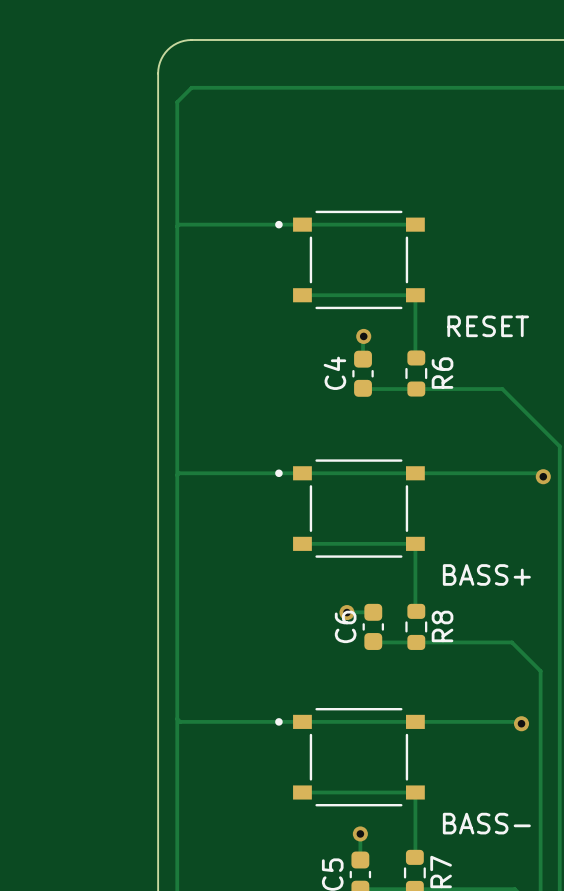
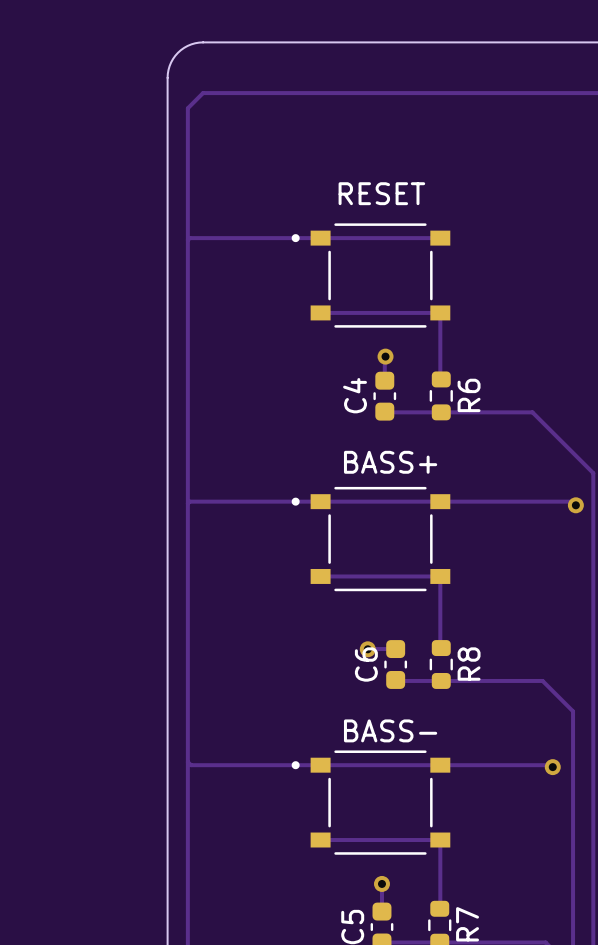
part value position: RESET (488, 326) -> RESET (381, 193)
part value position: BASS+ (486, 574) -> BASS+ (390, 462)
part value position: BASS- (486, 823) -> BASS- (390, 730)

